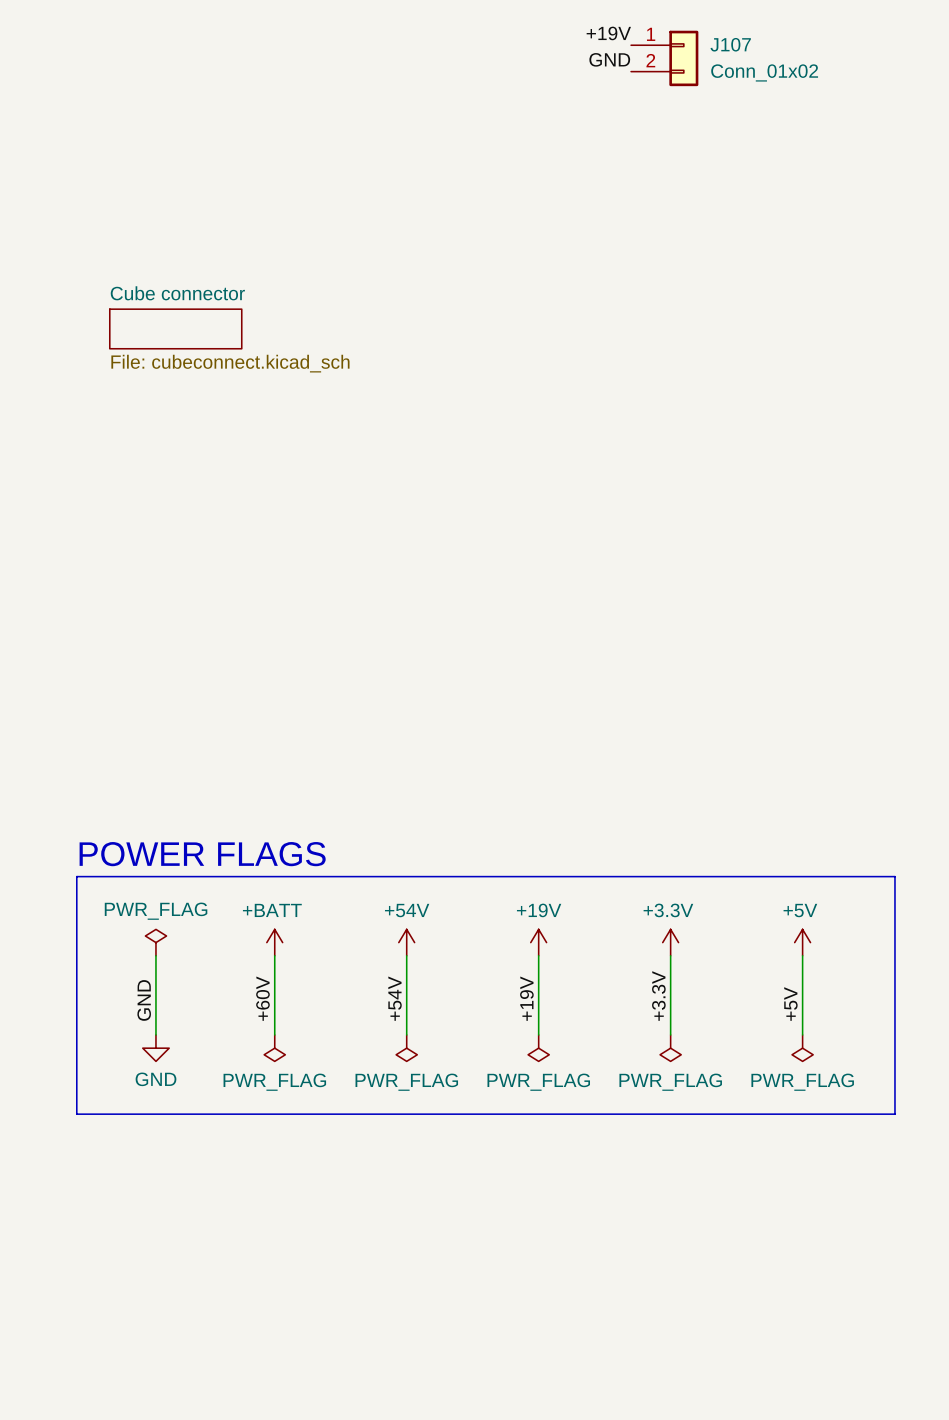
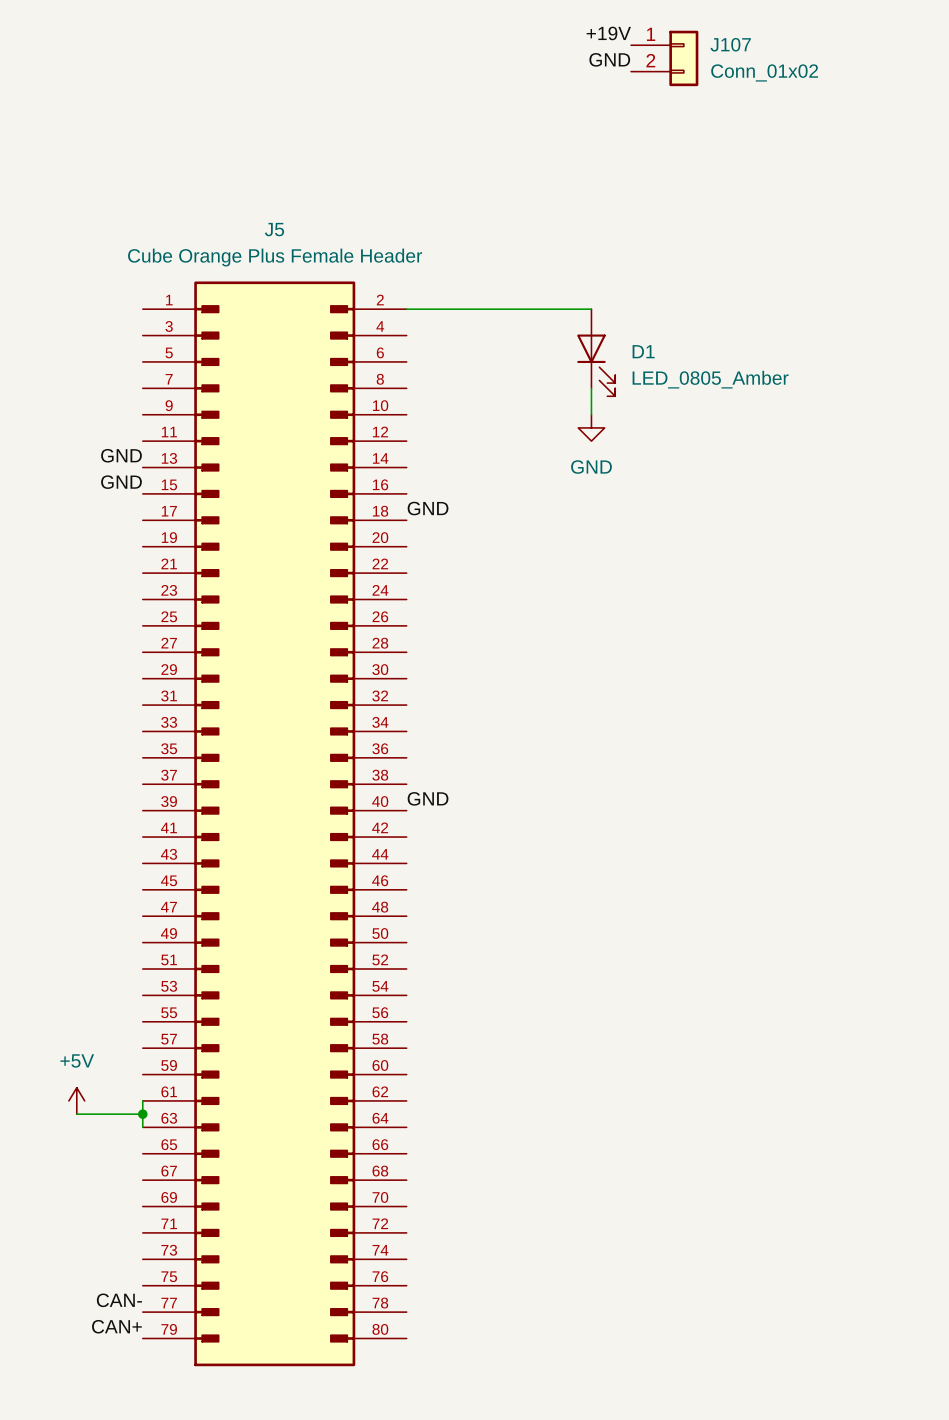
wire: none -> (406, 309) (591, 309)
sheet Cube connector: File: cubeconnect.kicad_sch (175, 328) -> none
D1: none -> LED_0805_Amber (596, 352)
wire: none -> (591, 388) (591, 414)
power symbol: none -> GND (591, 427)
label: none -> GND (121, 455)
label: none -> GND (121, 482)
label: none -> GND (428, 508)
label: none -> GND (428, 798)
J5: none -> Cube Orange Plus Female Header (274, 823)
text: POWER FLAGS (202, 854) -> none
line: (76, 876) (894, 876) (894, 1114) (76, 1114) (76, 876) -> none
power symbol: PWR_FLAG (155, 942) -> none
power symbol: +BATT (274, 942) -> none
power symbol: +54V (406, 942) -> none
power symbol: +19V (538, 942) -> none
power symbol: +3.3V (670, 942) -> none
power symbol: +5V (802, 942) -> none
wire: (155, 955) (155, 1034) -> none
wire: (406, 955) (406, 1034) -> none
wire: (538, 955) (538, 1034) -> none
wire: (670, 955) (670, 1034) -> none
wire: (802, 955) (802, 1034) -> none
label: +3.3V (658, 996) -> none
label: +60V (262, 998) -> none
label: +54V (395, 998) -> none
label: +19V (526, 998) -> none
label: GND (144, 1000) -> none
label: +5V (790, 1004) -> none
power symbol: GND (155, 1048) -> none
power symbol: PWR_FLAG (274, 1048) -> none
power symbol: PWR_FLAG (406, 1048) -> none
power symbol: PWR_FLAG (538, 1048) -> none
power symbol: PWR_FLAG (670, 1048) -> none
power symbol: PWR_FLAG (802, 1048) -> none
power symbol: none -> +5V (76, 1100)
wire: none -> (142, 1100) (142, 1127)
junction: none -> (142, 1114)
label: none -> CAN- (119, 1300)
label: none -> CAN+ (116, 1326)

